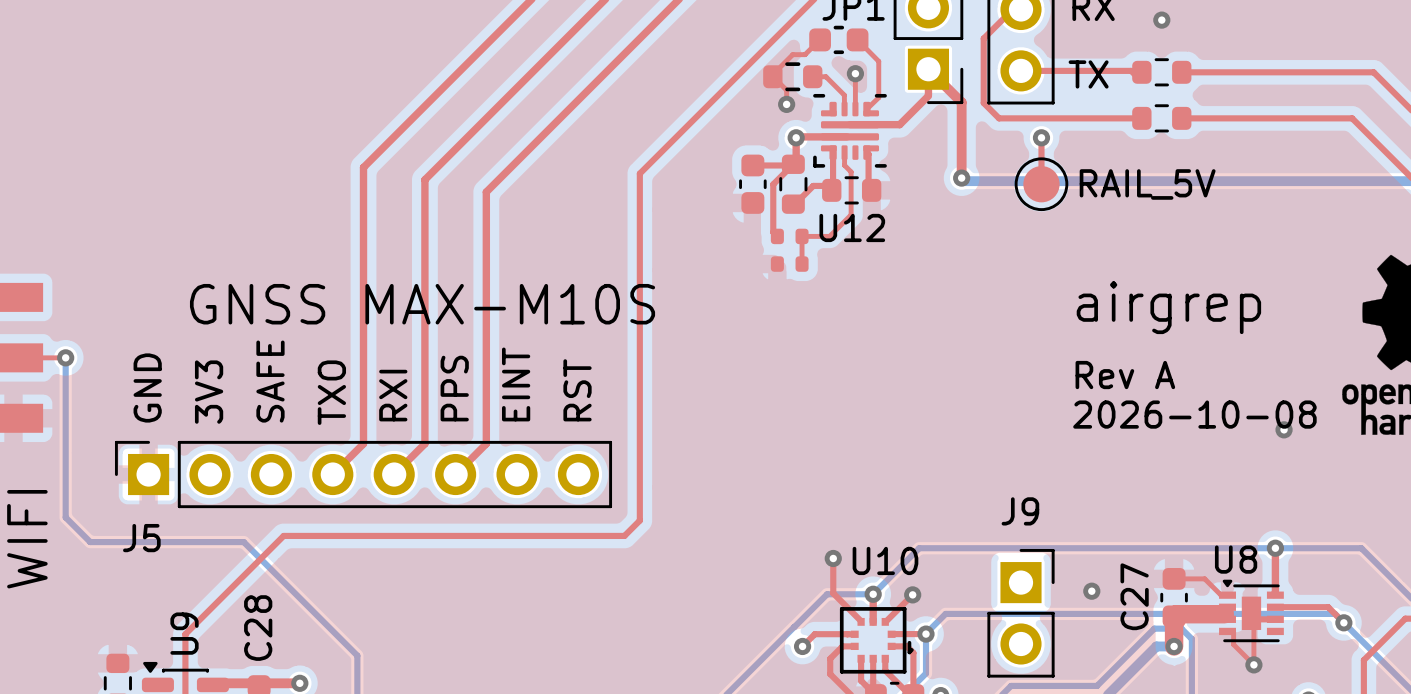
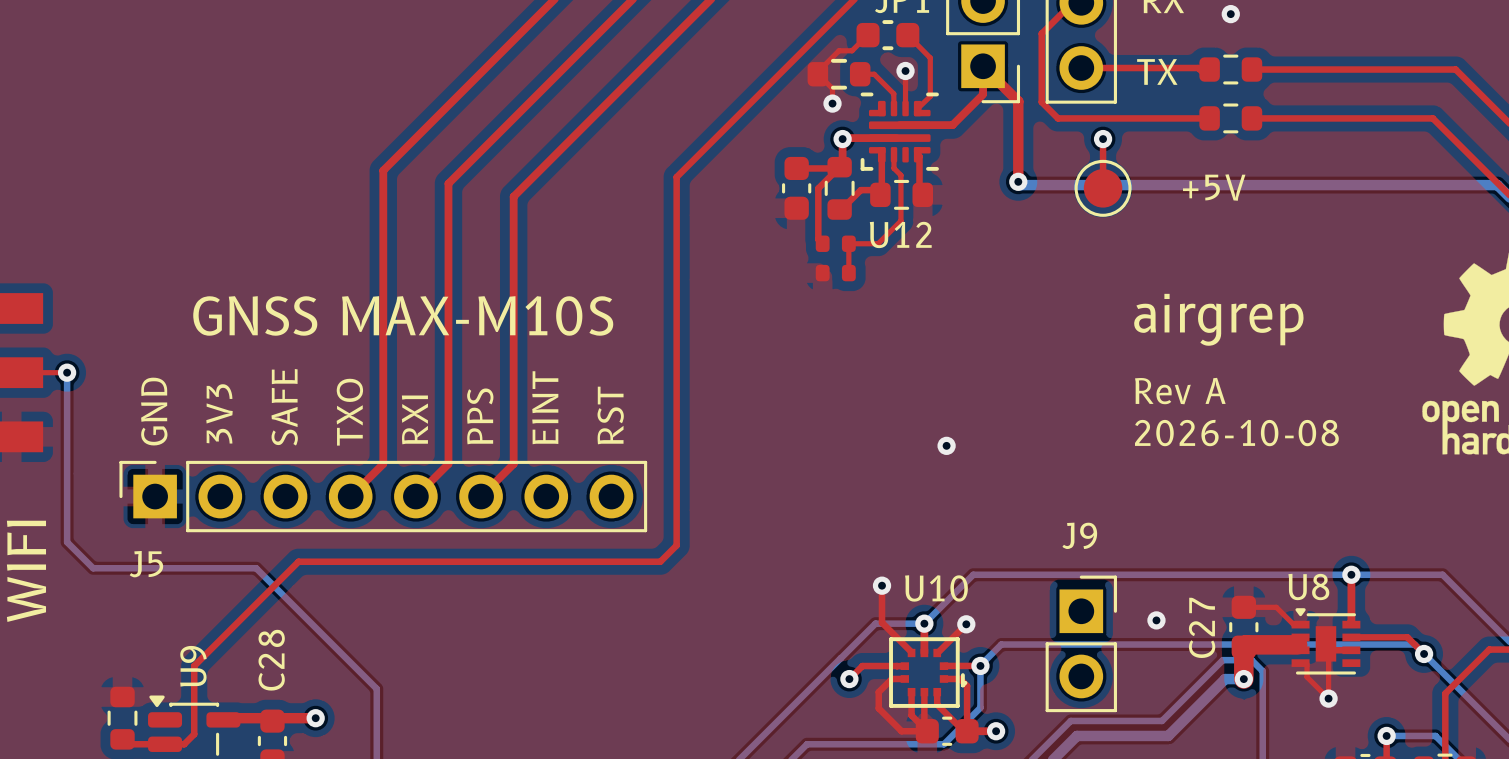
part value: RAIL_5V (1147, 184) -> +5V (1214, 187)
via: none -> (946, 445)
via: (1284, 429) -> none

